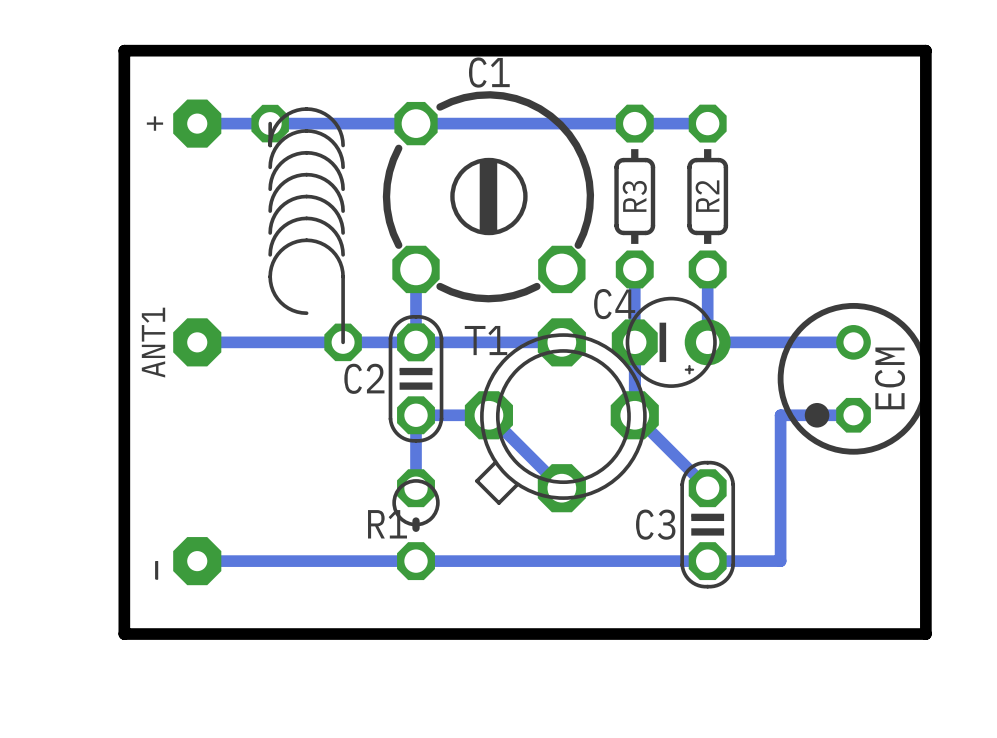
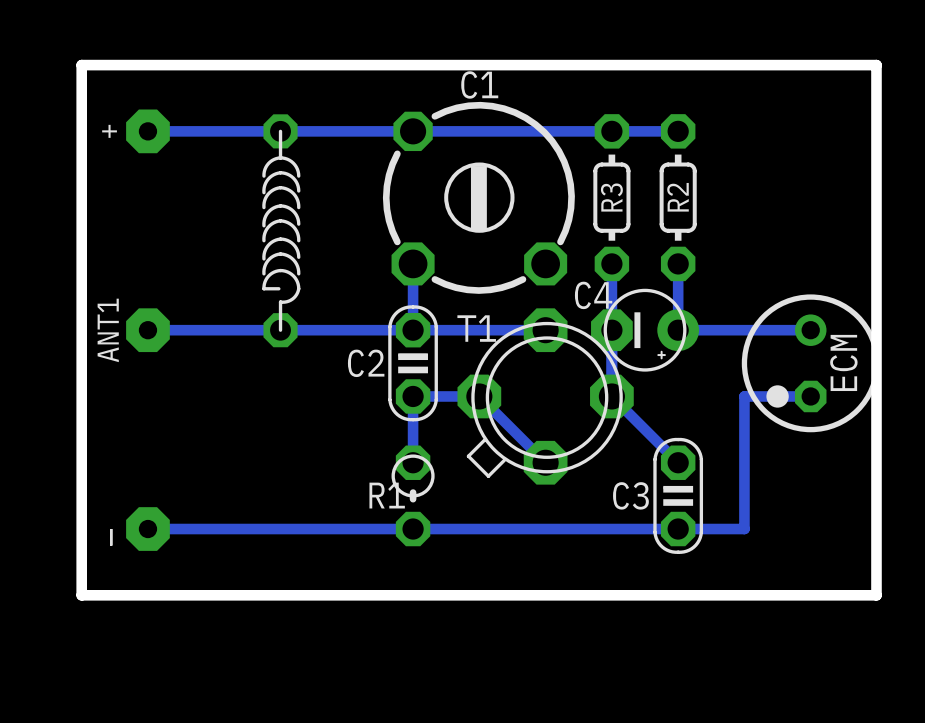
board edge: (124, 50) (124, 634) -> (147, 65) (81, 65) (81, 595) (147, 595)
bottom track: none -> (147, 131) (214, 131)
part position: (197, 123) -> (147, 131)
part: none -> (281, 230)
part: (306, 232) -> none
bottom track: none -> (147, 330) (214, 330)
ANT1 position: (197, 342) -> (147, 330)
bottom track: none -> (147, 529) (214, 529)
part position: (197, 561) -> (147, 529)

